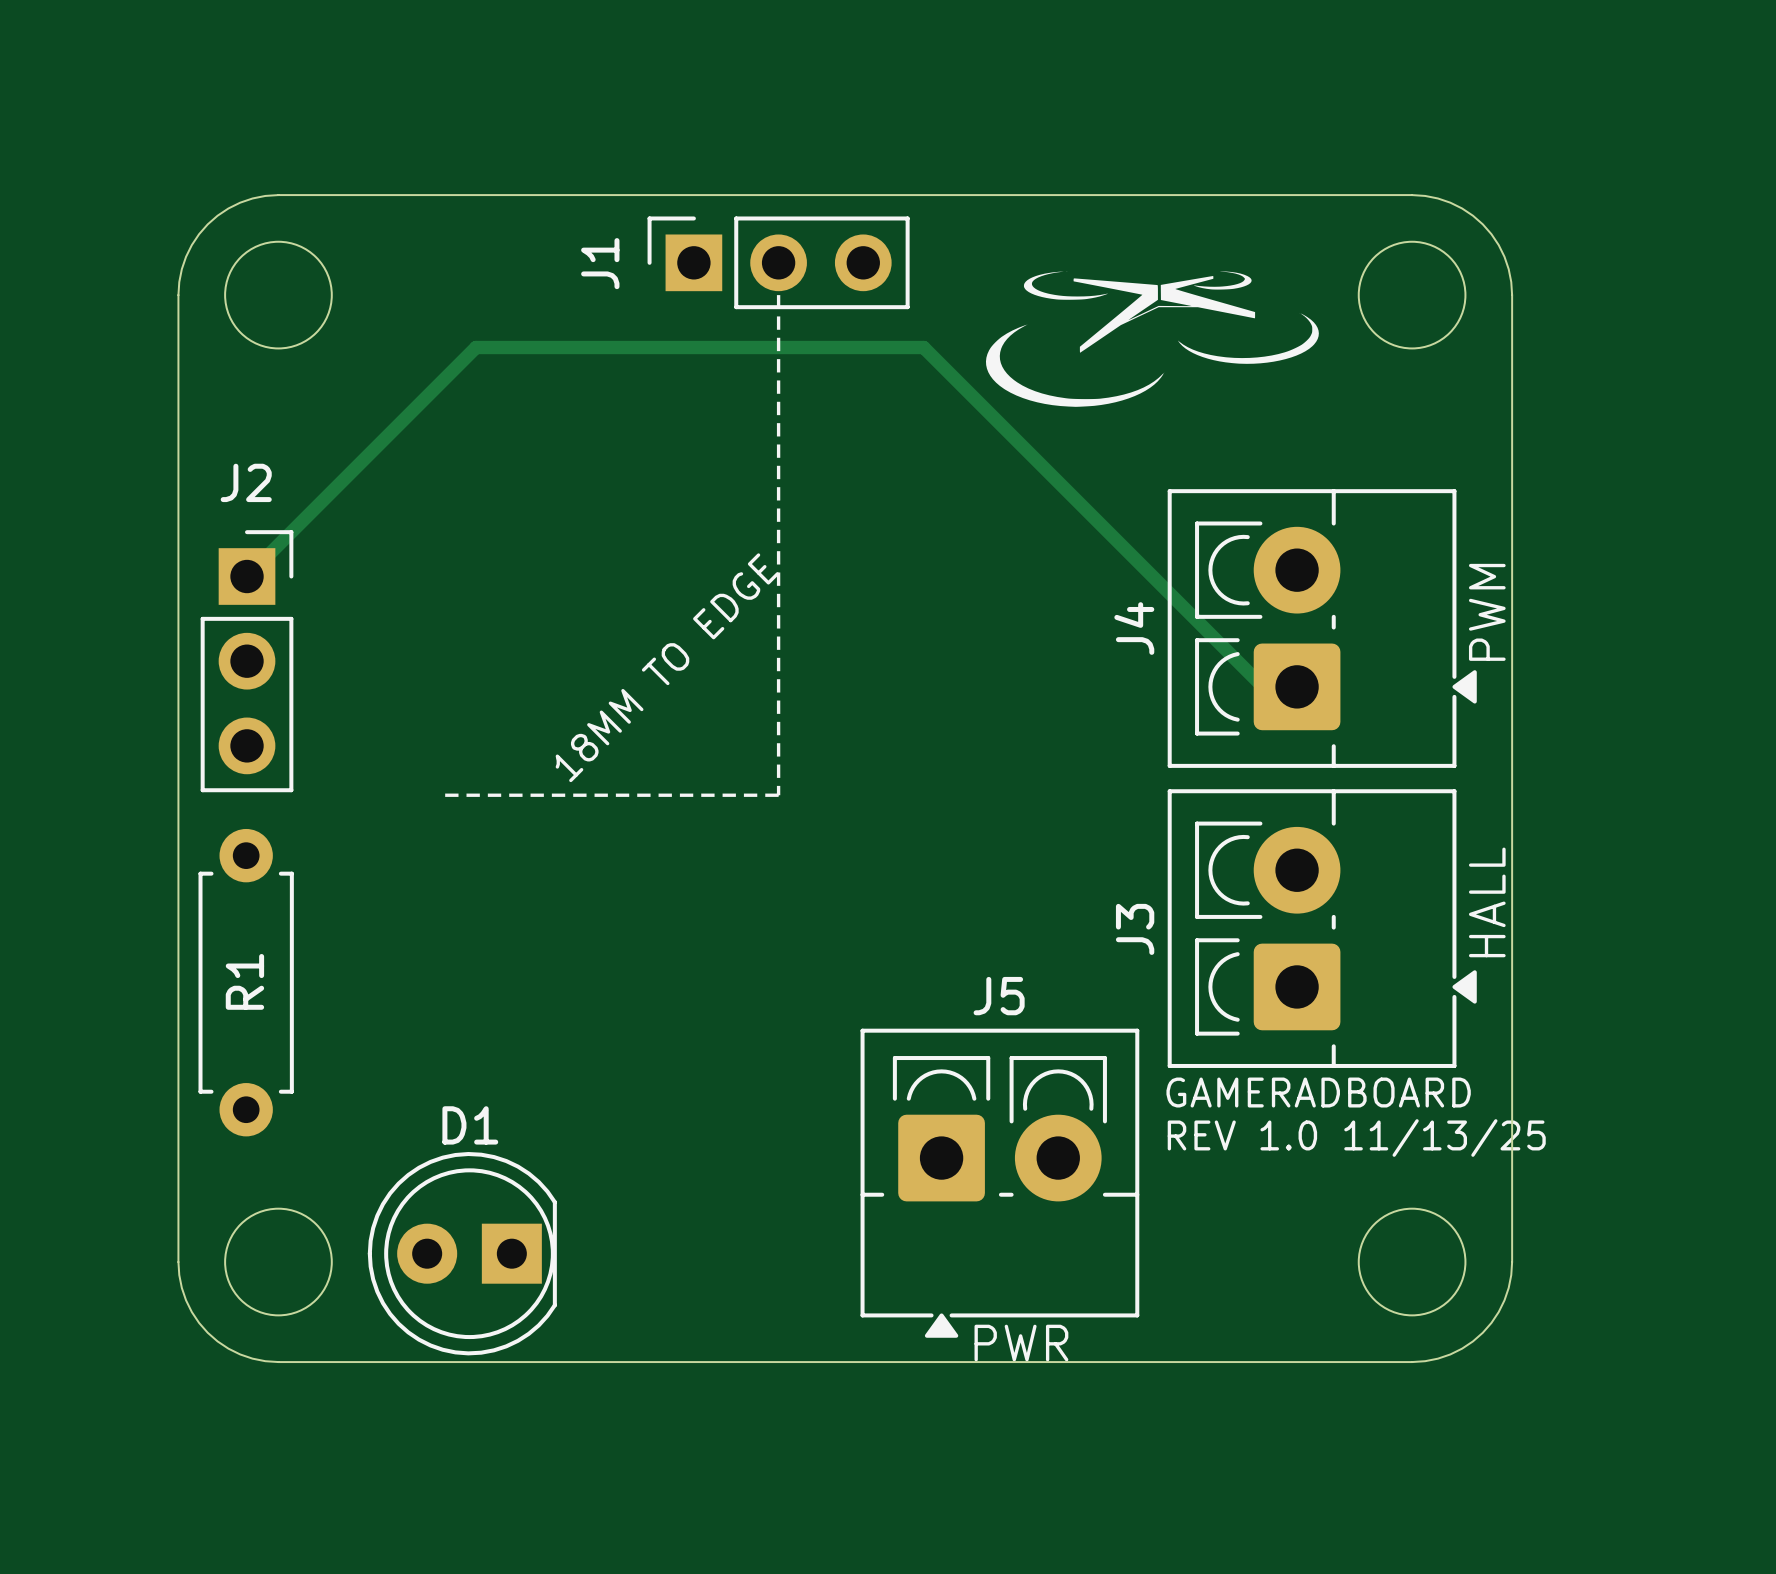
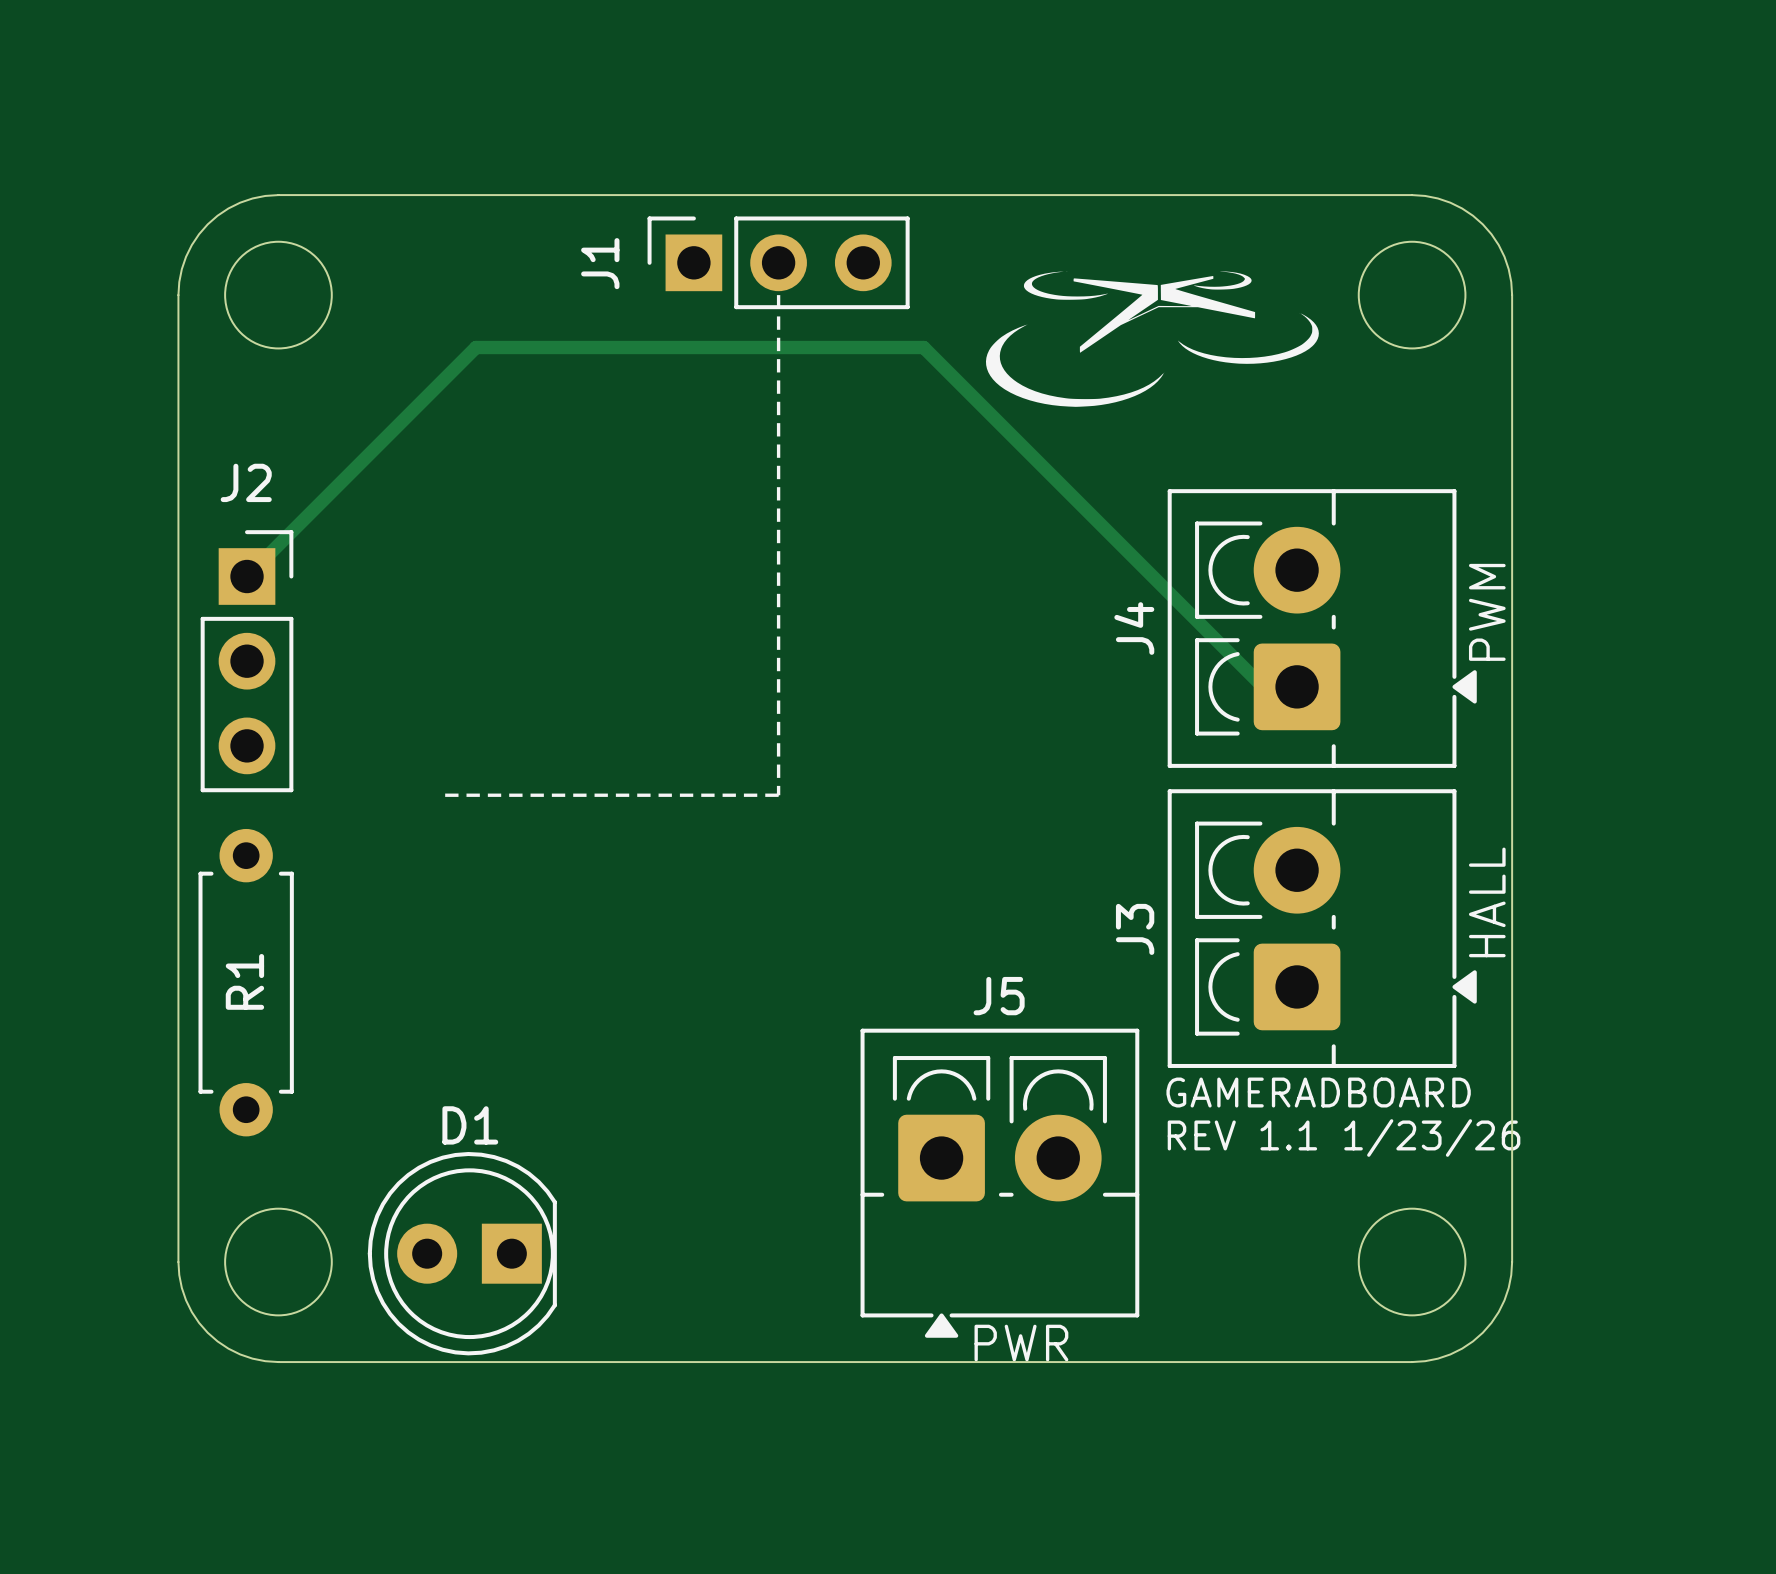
text: 18MM TO EDGE (667, 667) -> none
text: REV 1.0 11/13/25 (1356, 1138) -> REV 1.1 1/23/26 (1344, 1138)

